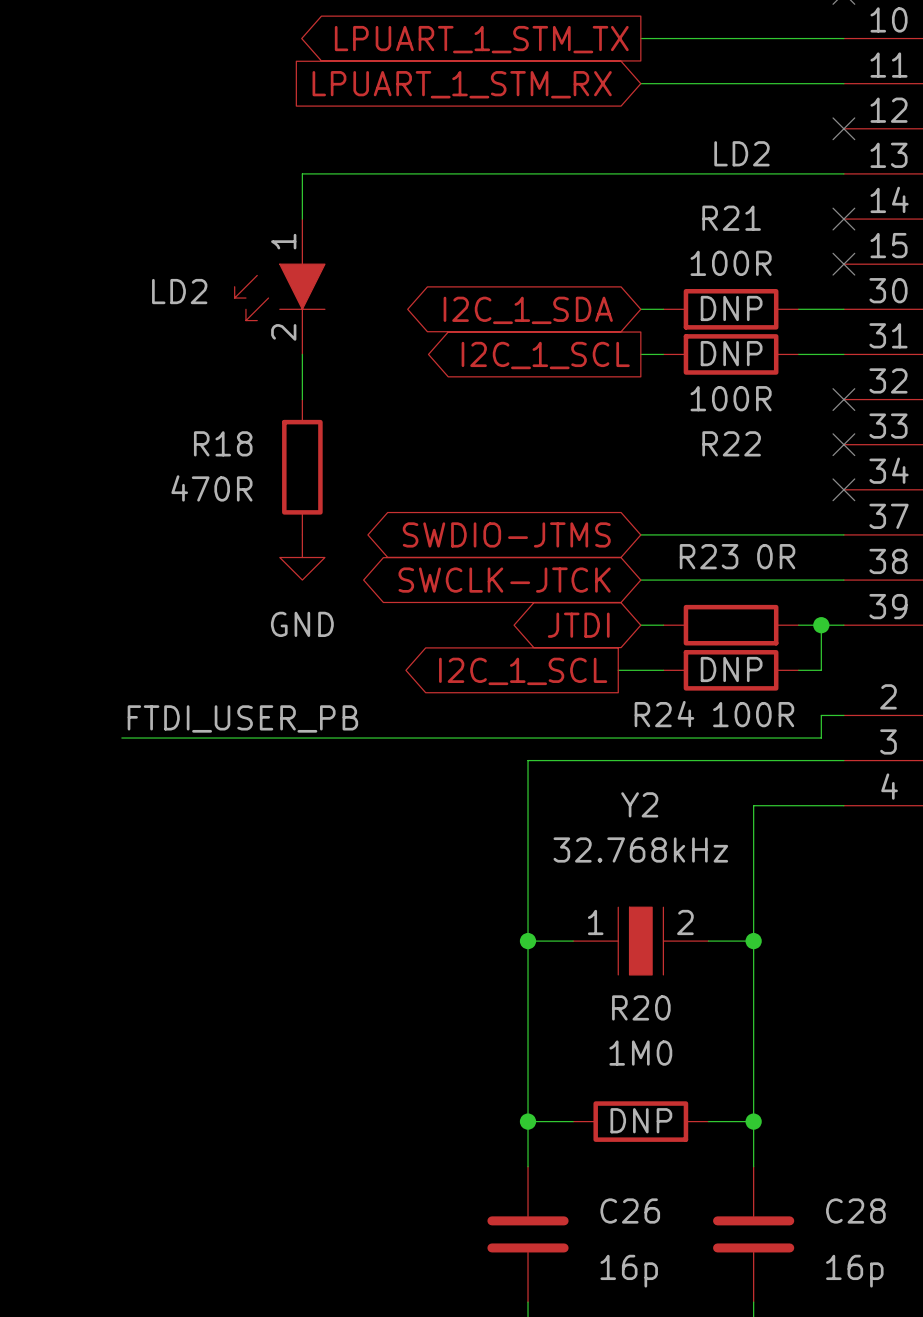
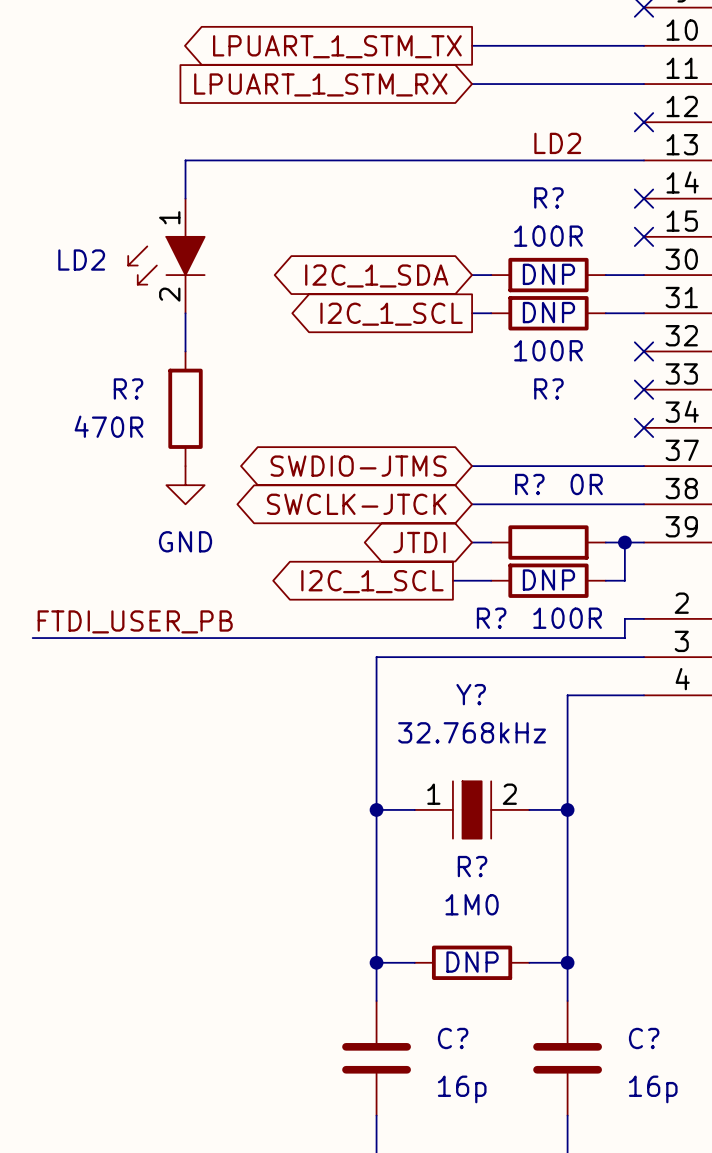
R21 name: R21 (731, 218) -> R? (548, 197)
R18 name: R18 (223, 443) -> R? (128, 388)
R22 name: R22 (731, 443) -> R? (548, 388)
R23 name: R23 (709, 556) -> R? (529, 484)
R24 name: R24 (664, 714) -> R? (491, 618)
Y2 name: Y2 (639, 804) -> Y? (471, 694)
R20 name: R20 (641, 1007) -> R? (472, 866)
C26 name: C26 (630, 1211) -> C? (453, 1038)
C28 name: C28 (855, 1211) -> C? (644, 1038)

